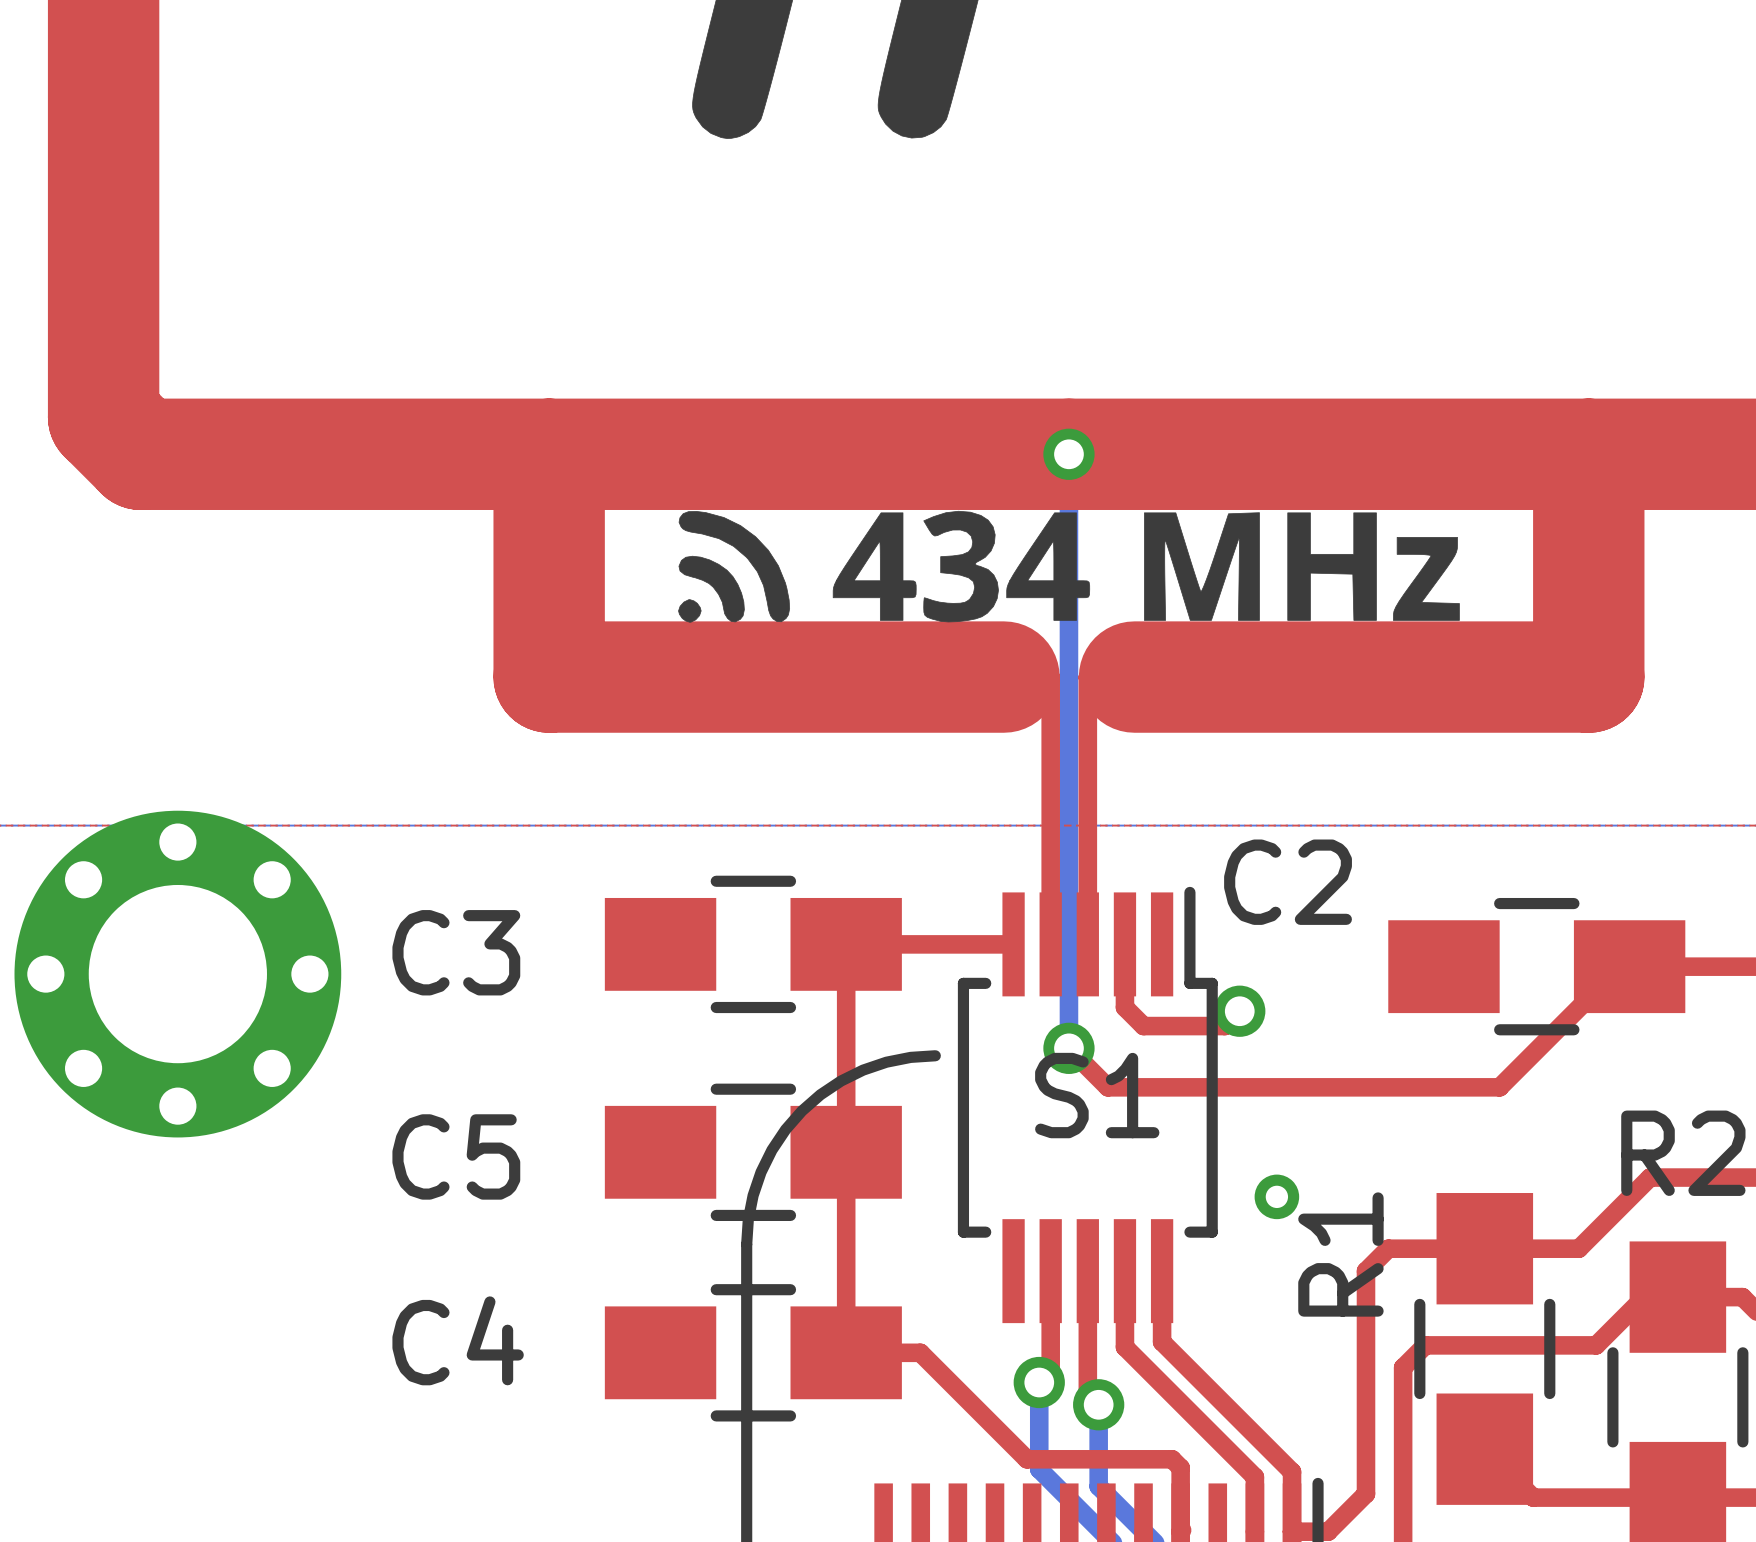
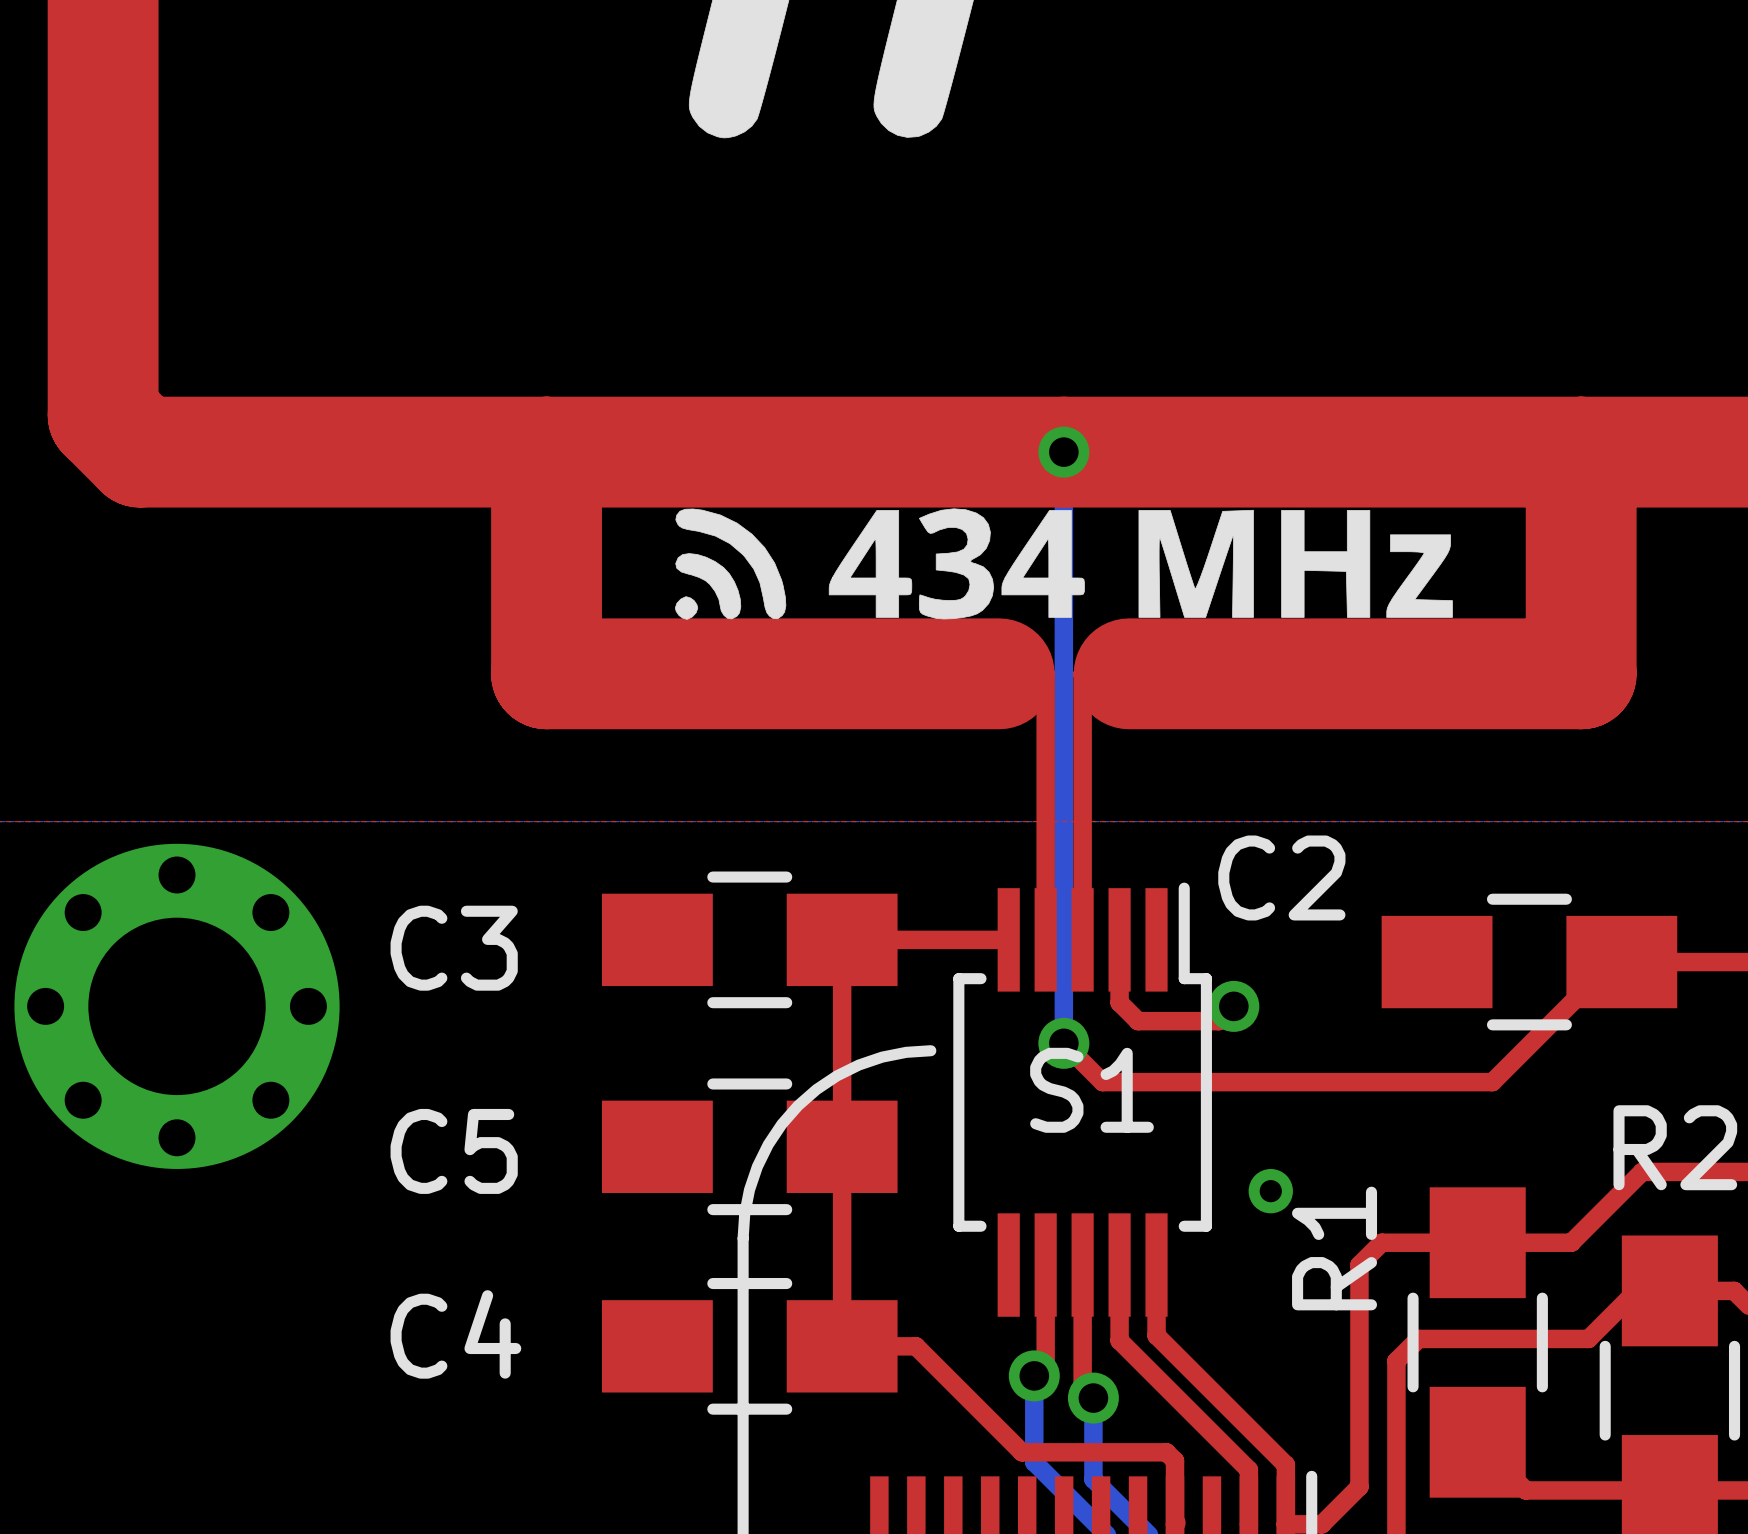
part position: (177, 974) -> (177, 1006)

